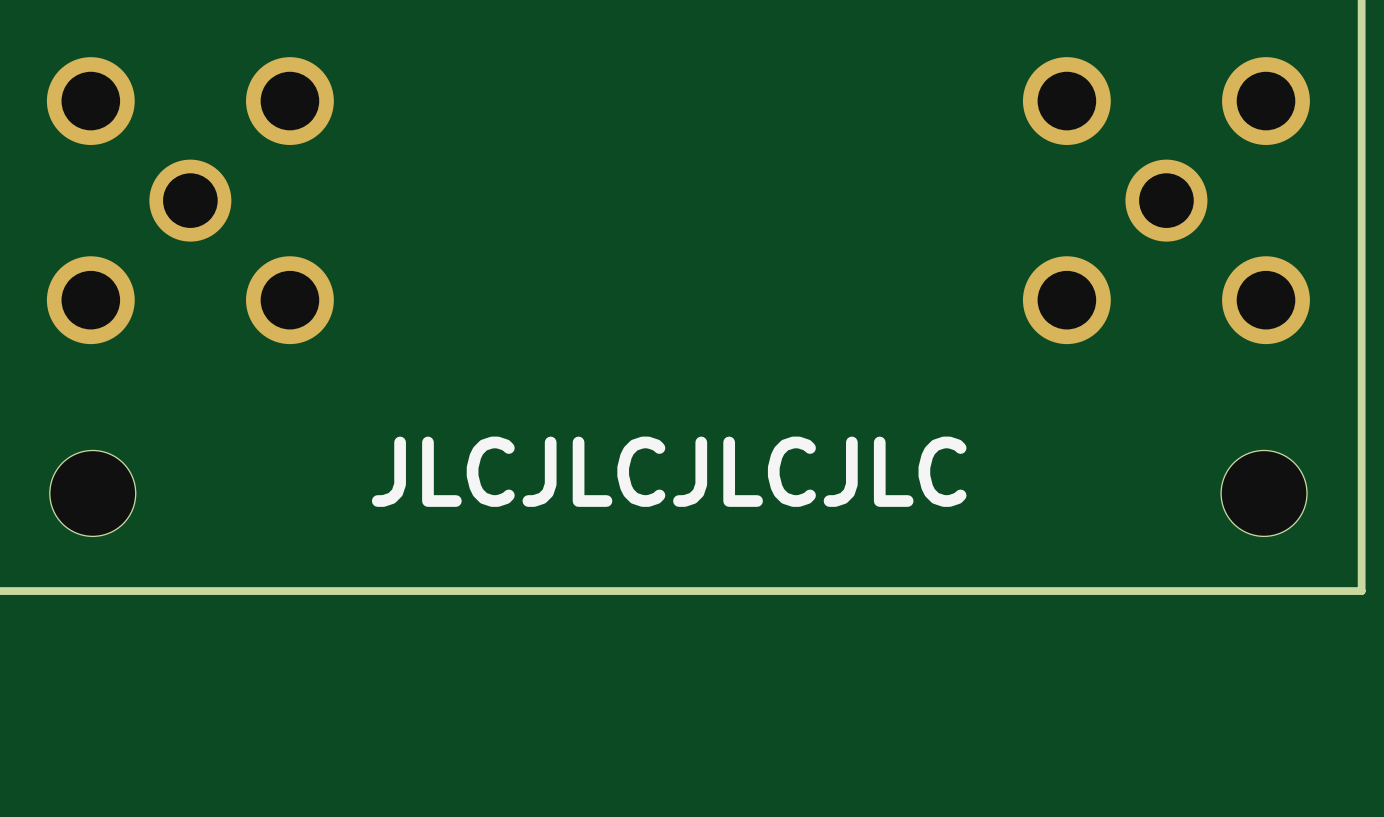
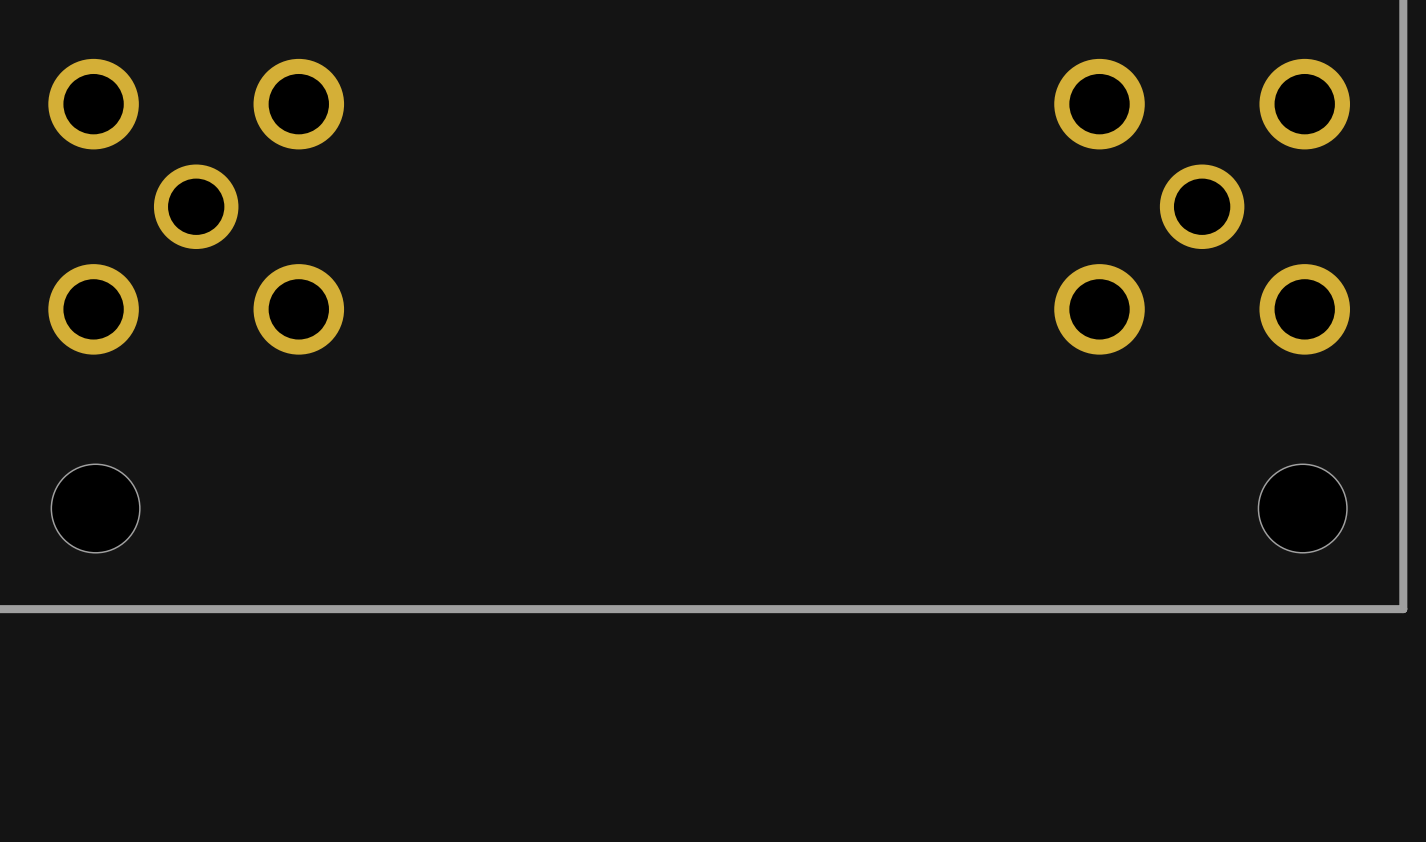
text: JLCJLCJLCJLC (669, 471) -> none

